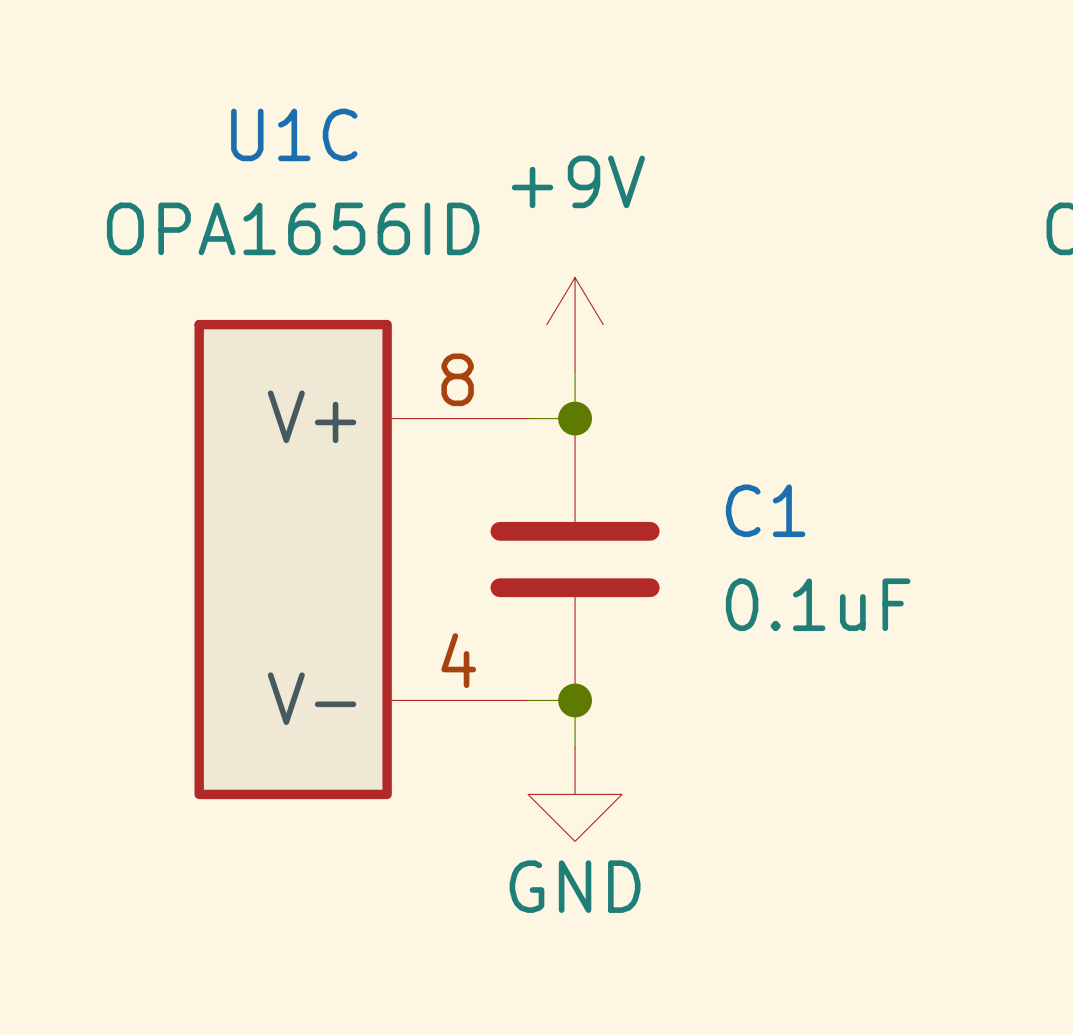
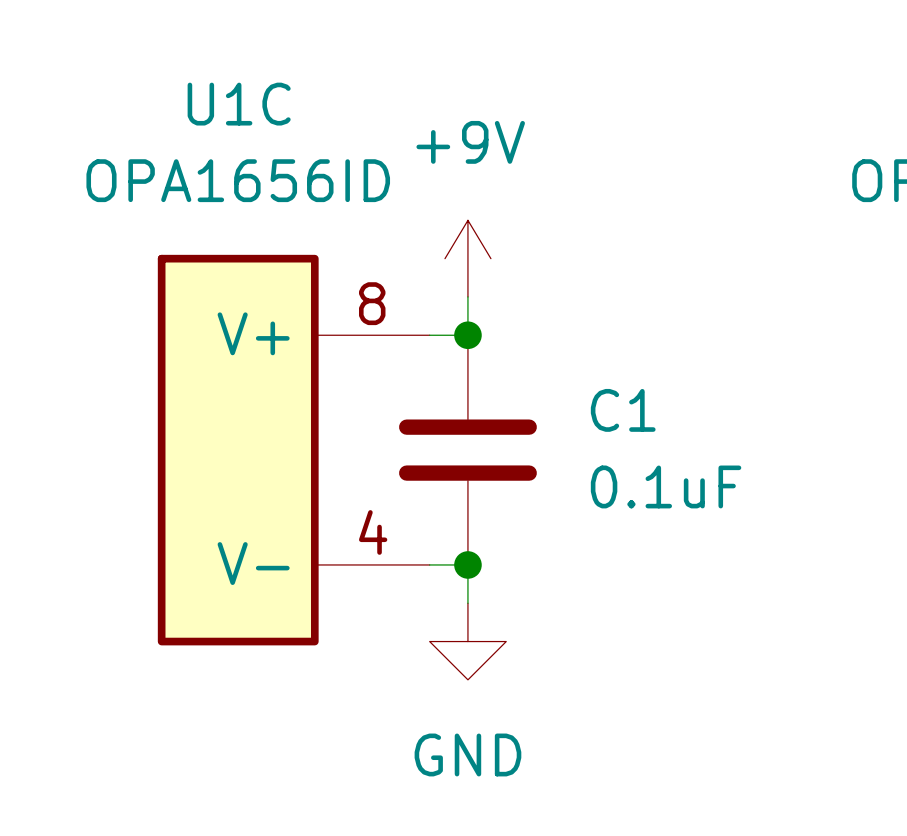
power symbol text position: GND (575, 886) -> GND (467, 754)

